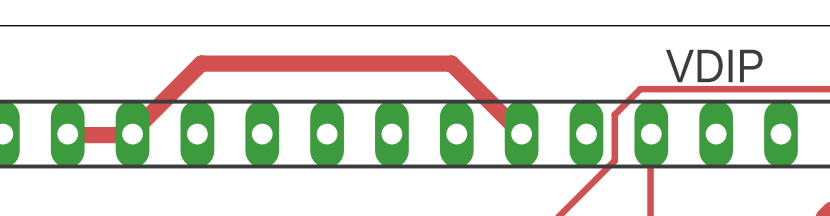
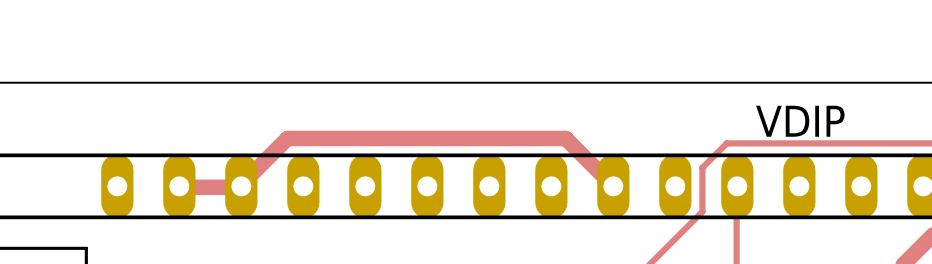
track: (180, 84) (201, 63) (451, 63) (471, 84) -> (287, 138) (565, 138)

